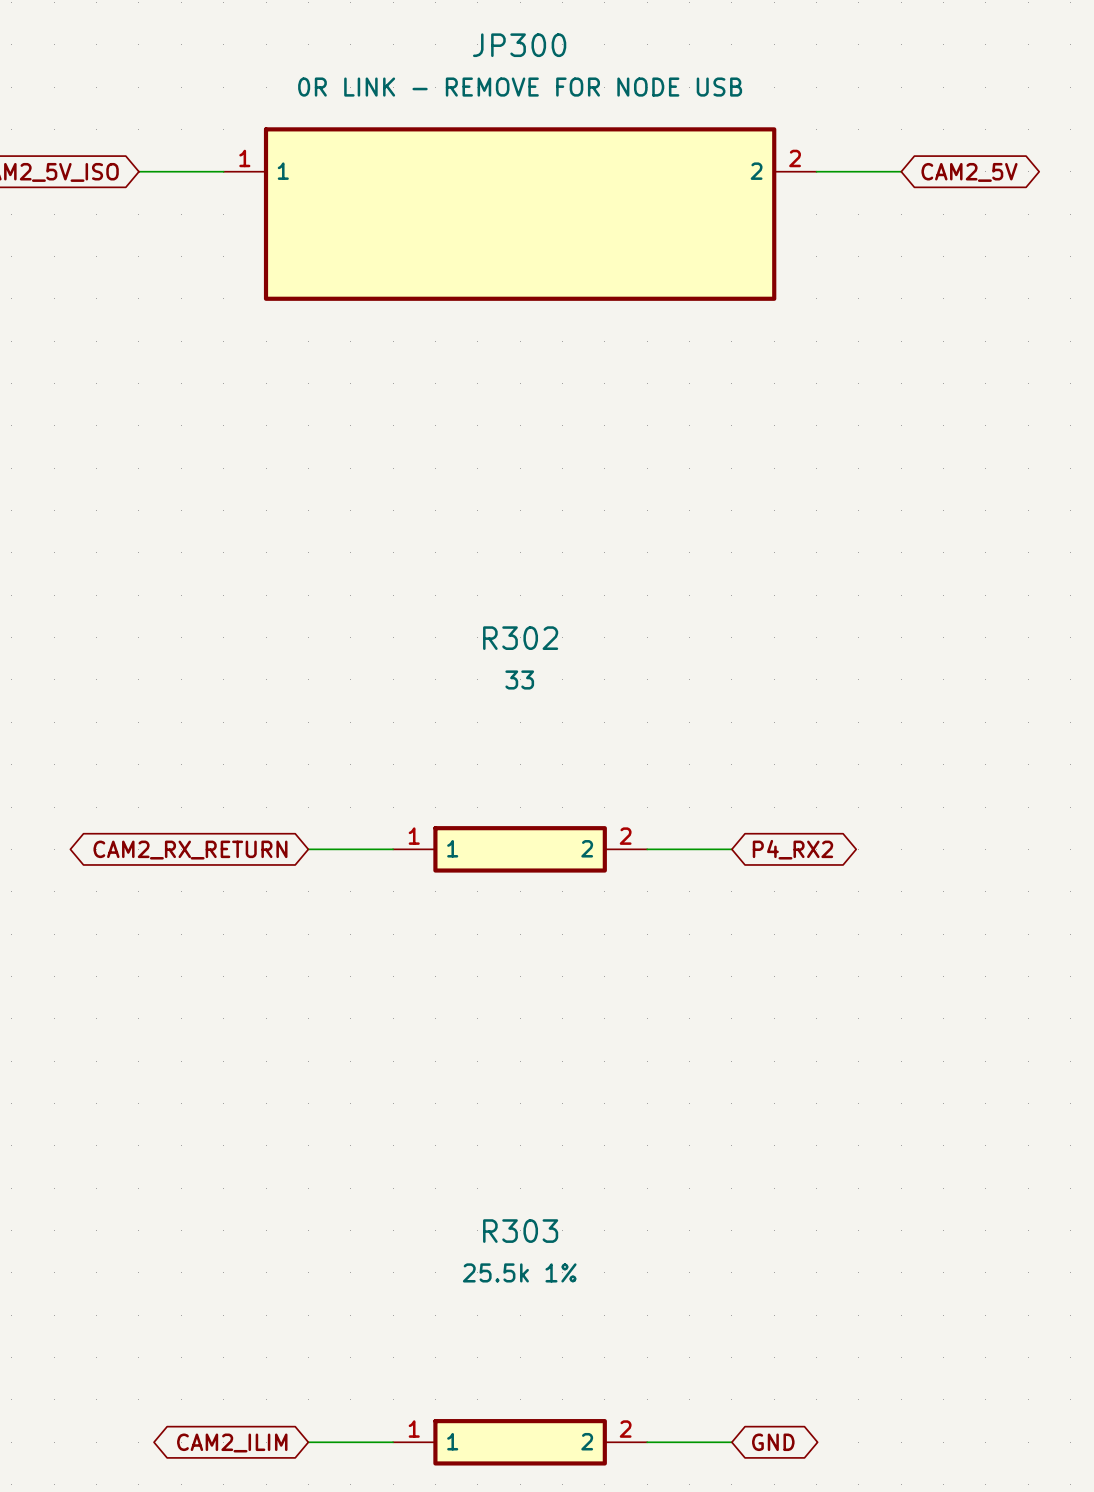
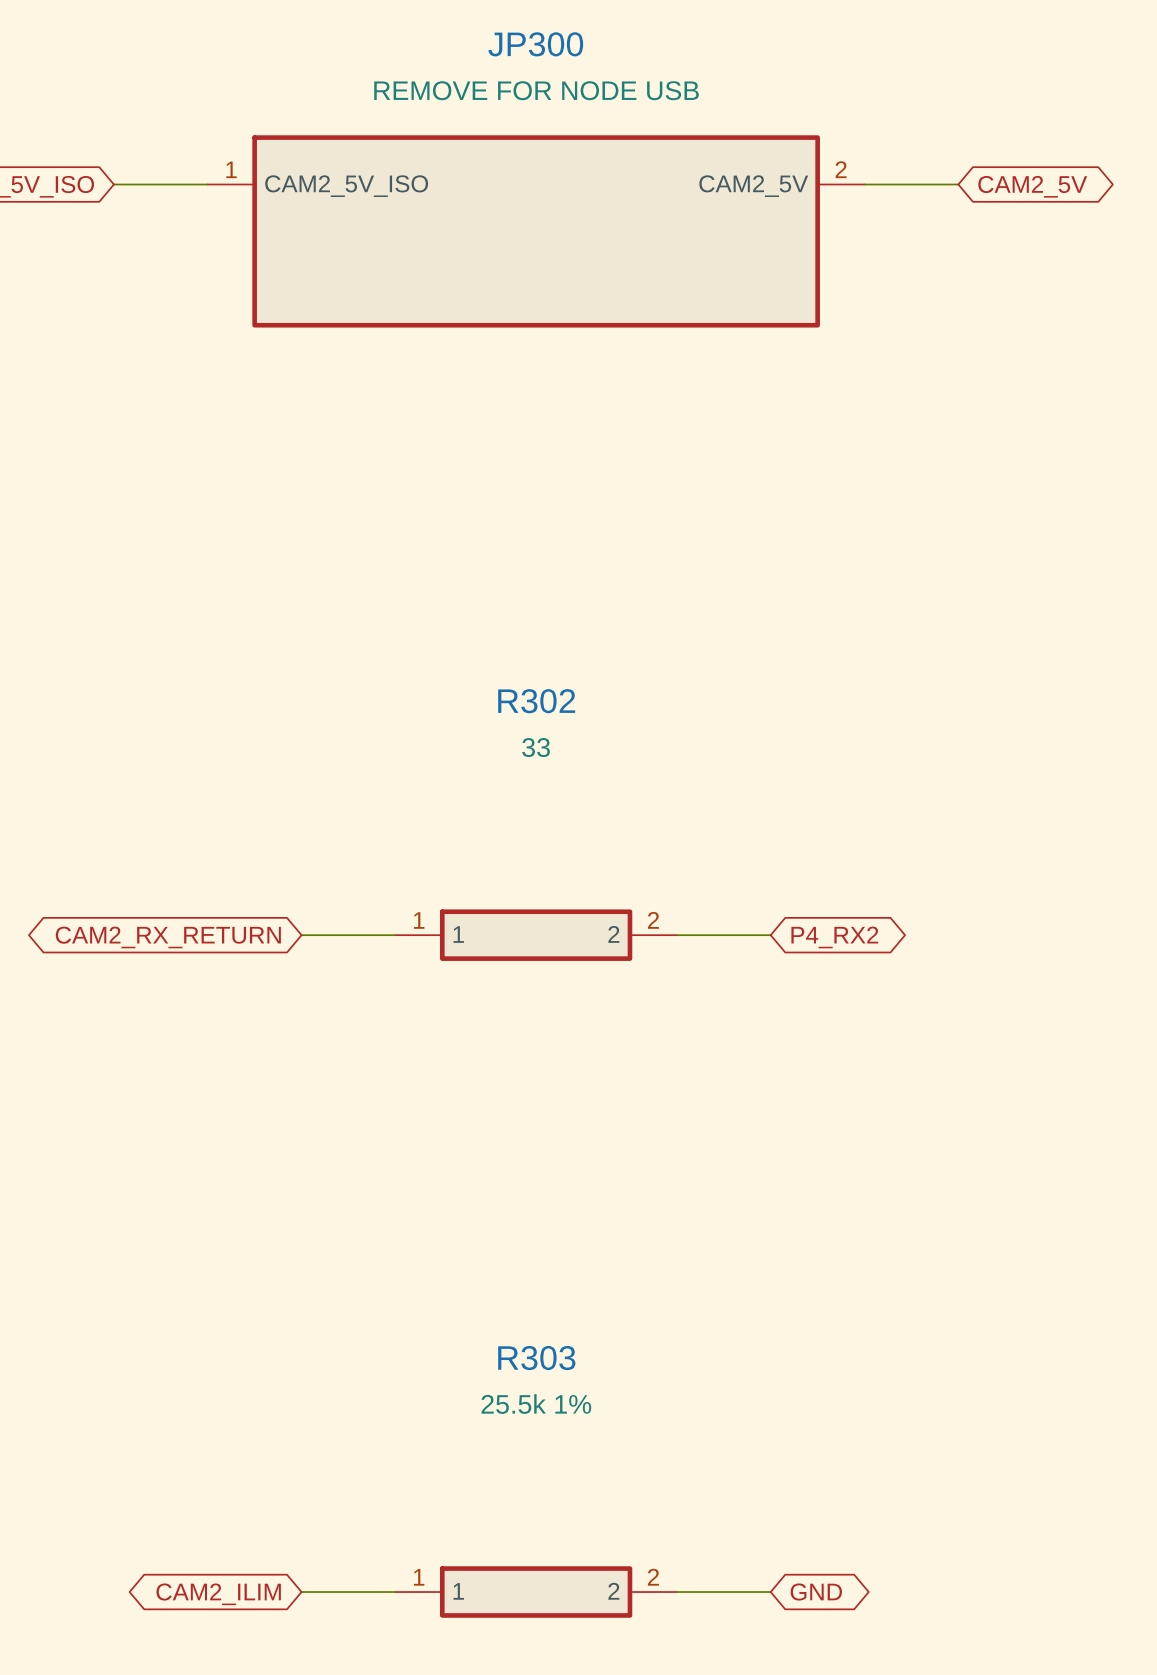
JP300 value: 0R LINK - REMOVE FOR NODE USB (520, 87) -> REMOVE FOR NODE USB (536, 90)
JP300 pin name: 1 (283, 171) -> CAM2_5V_ISO (346, 186)
JP300 pin name: 2 (756, 171) -> CAM2_5V (753, 186)

